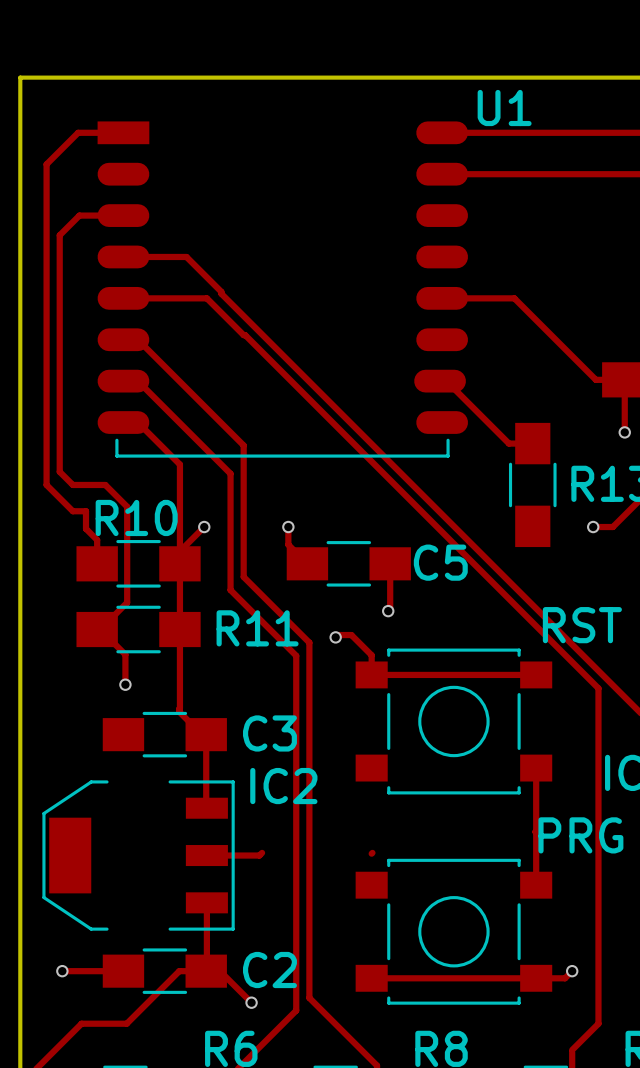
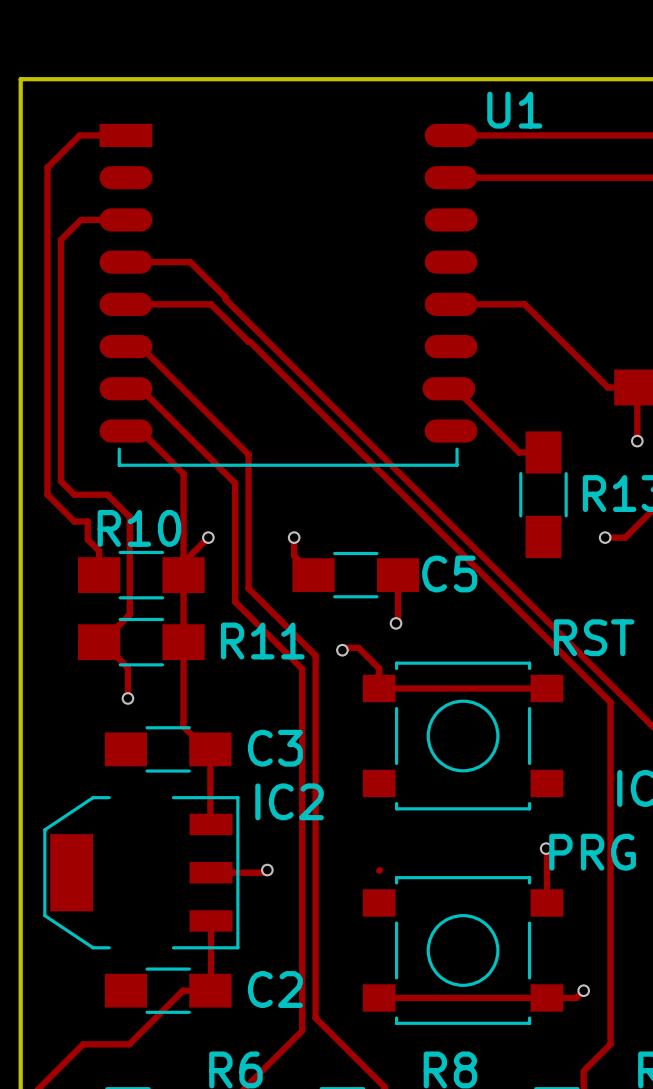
track: (536, 768) (535, 831) -> none
via: none -> (546, 848)
via: none -> (267, 870)
track: (62, 971) (123, 971) -> none
via: (62, 971) -> none
track: (206, 971) (220, 971) (251, 1002) -> none
via: (251, 1002) -> none

